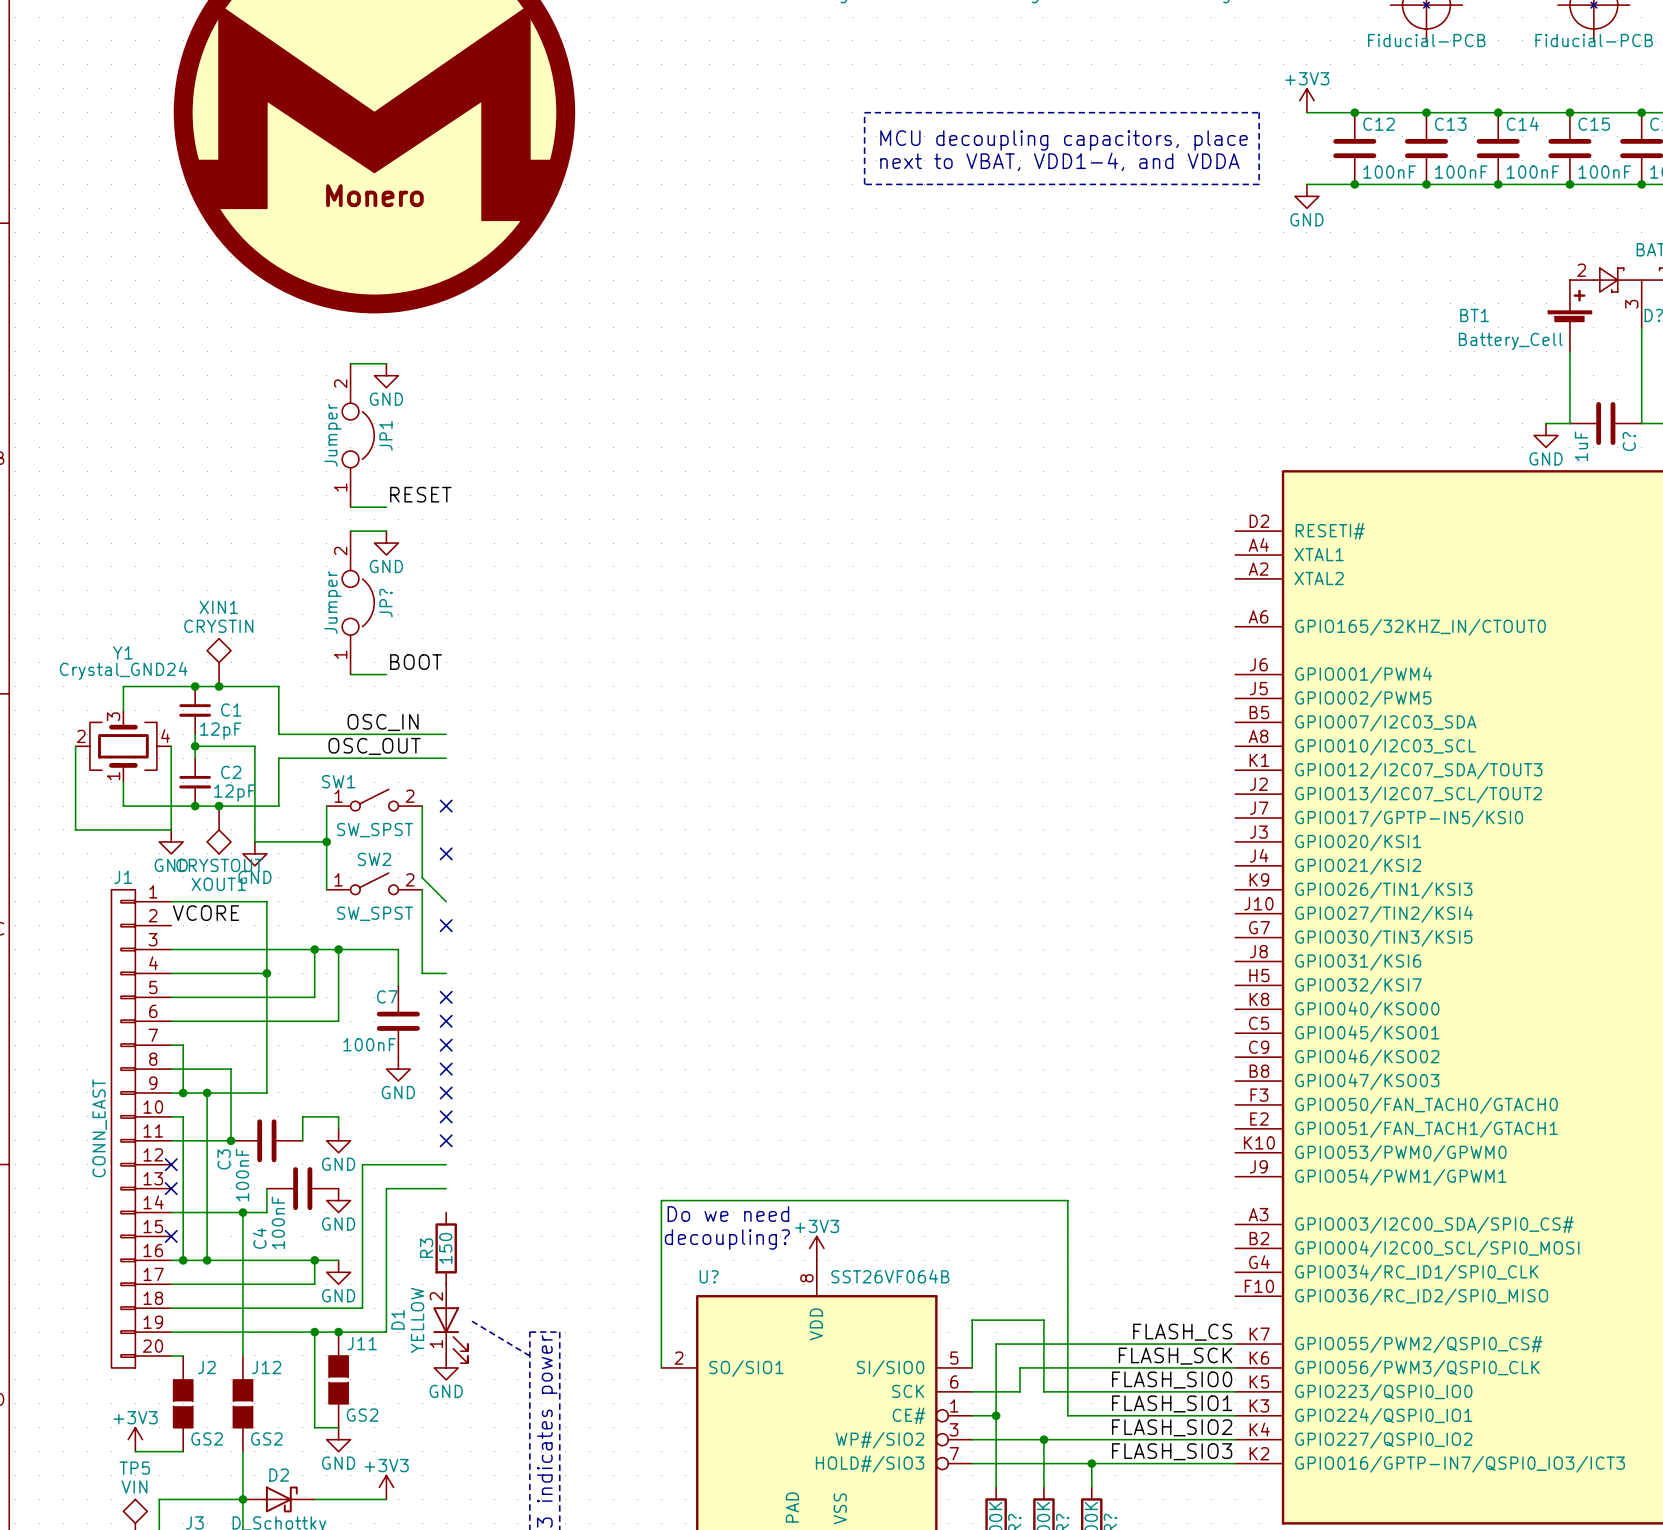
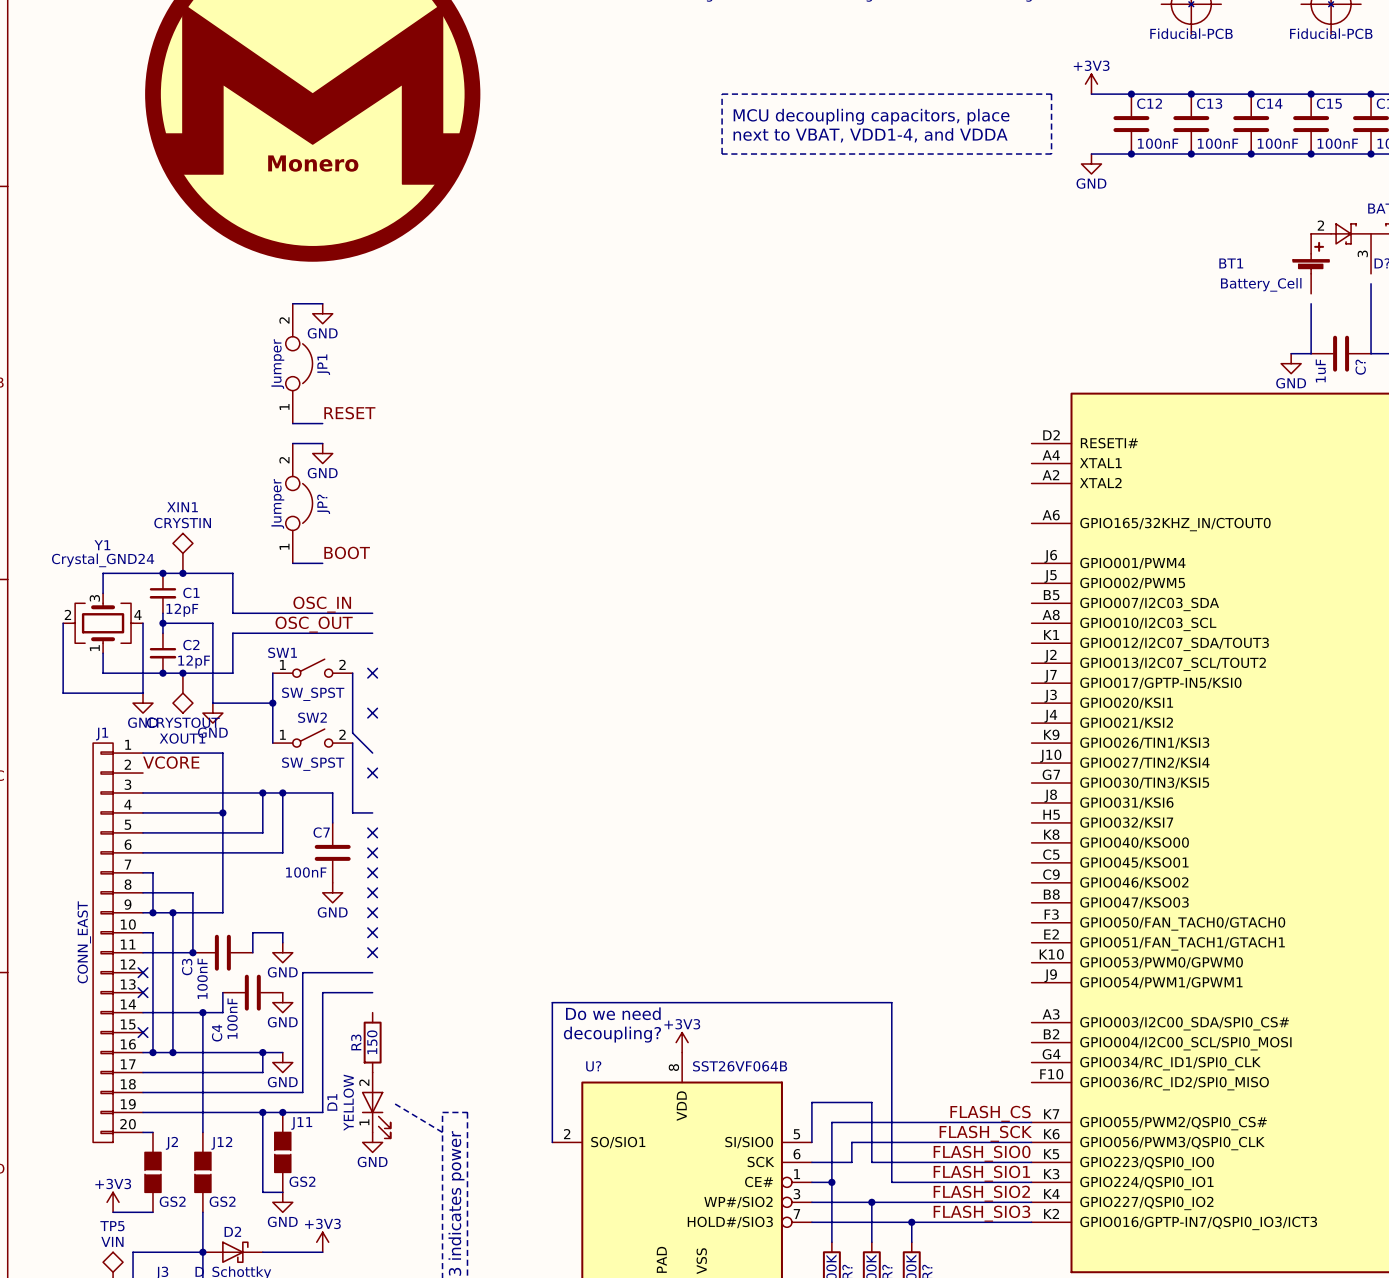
wire: (1641, 327) (1641, 339) -> none
wire: (1569, 351) (1569, 363) -> none

